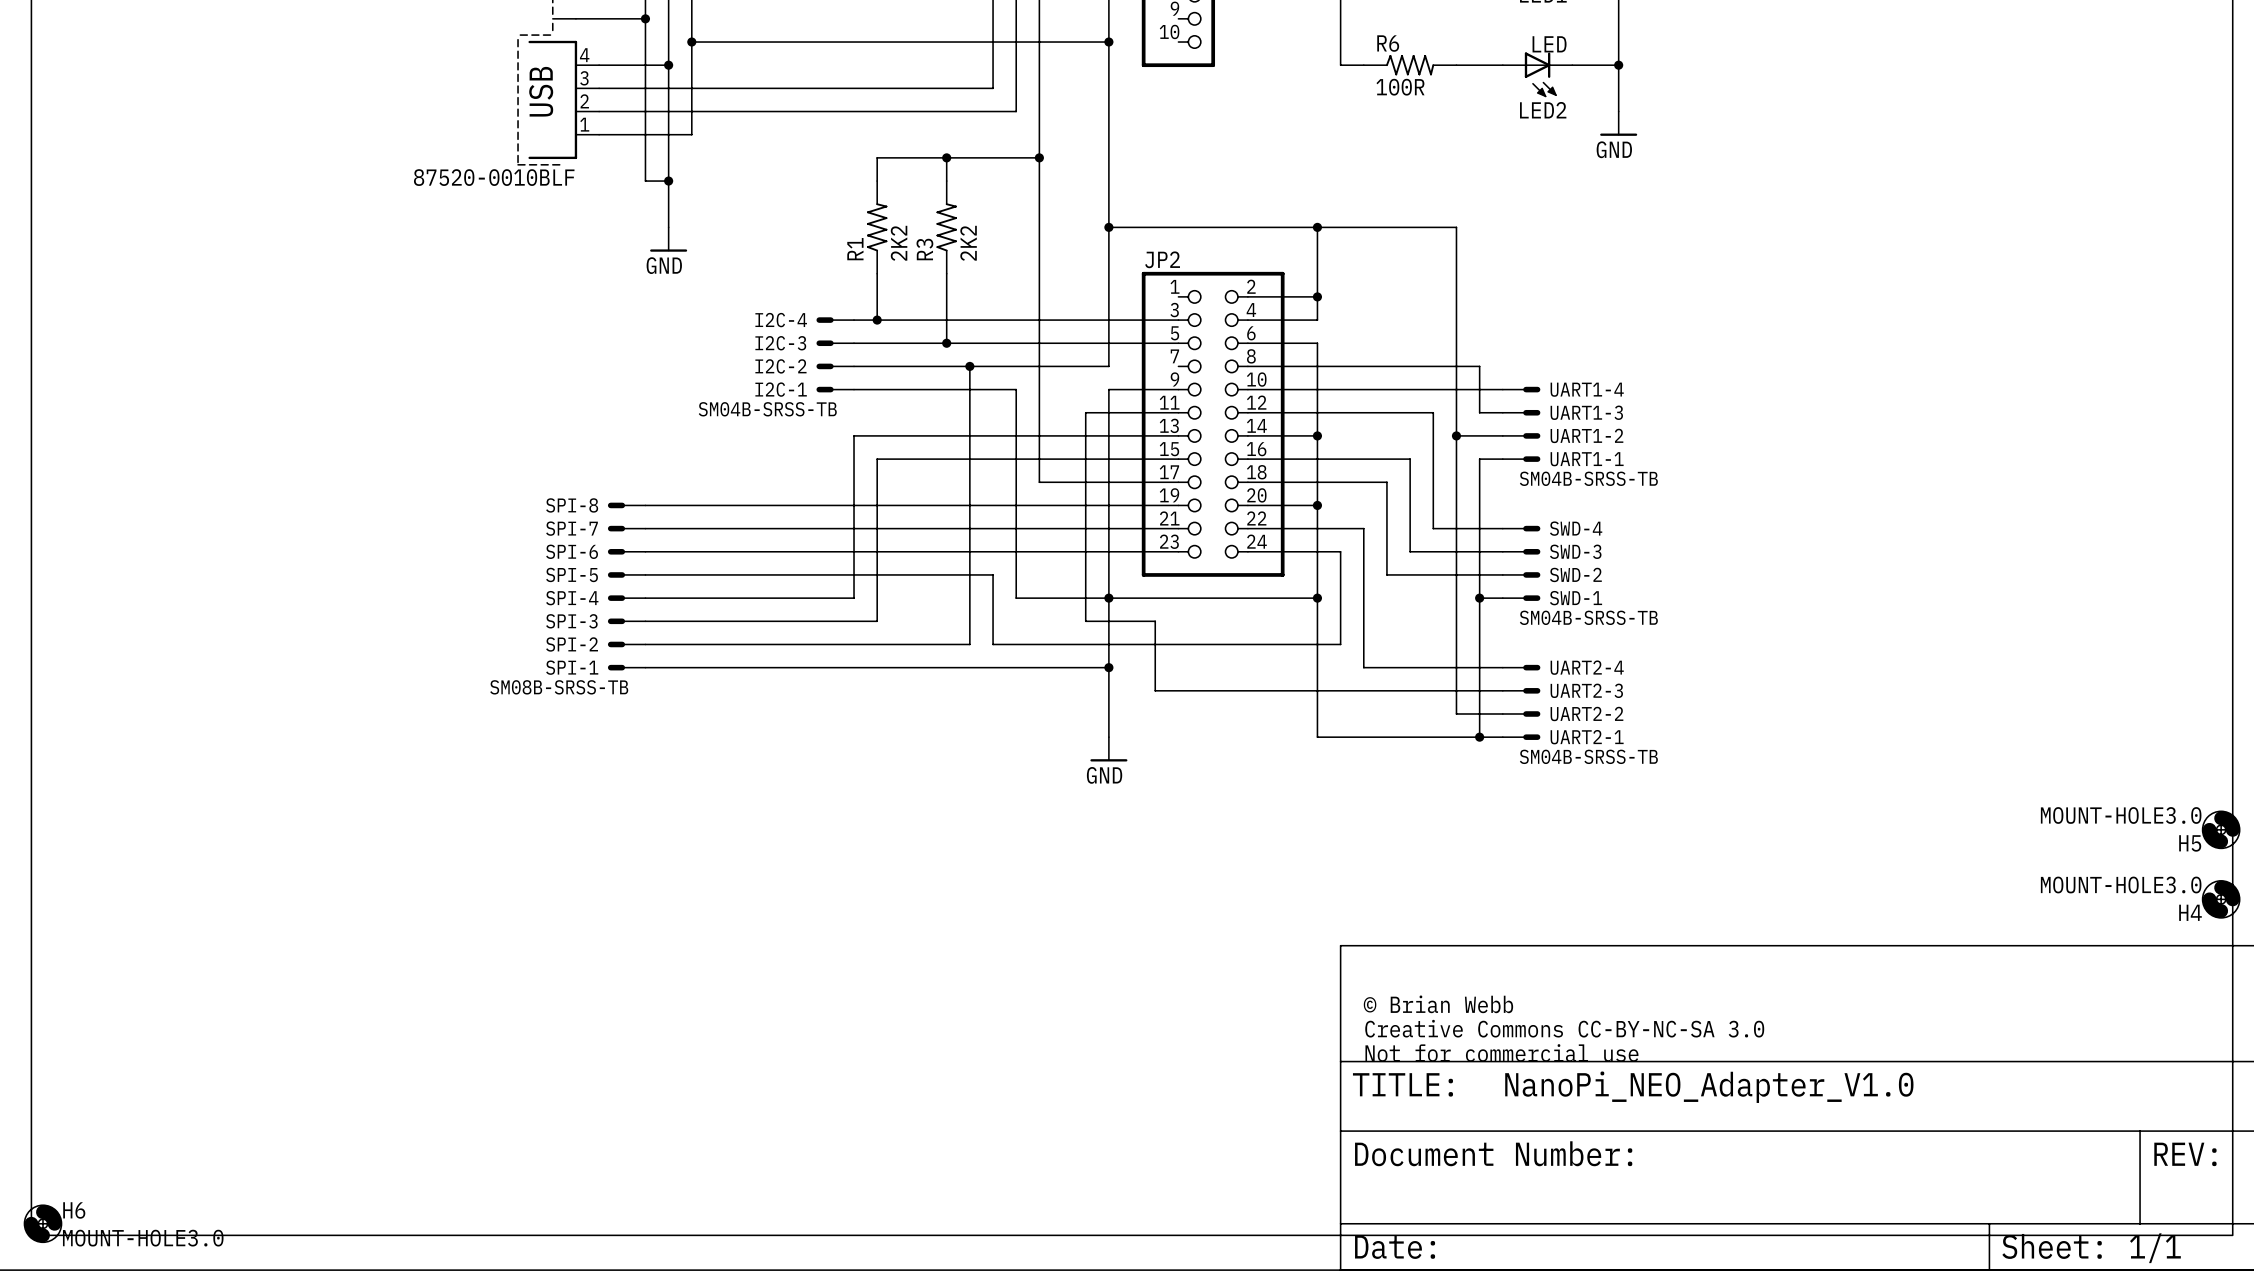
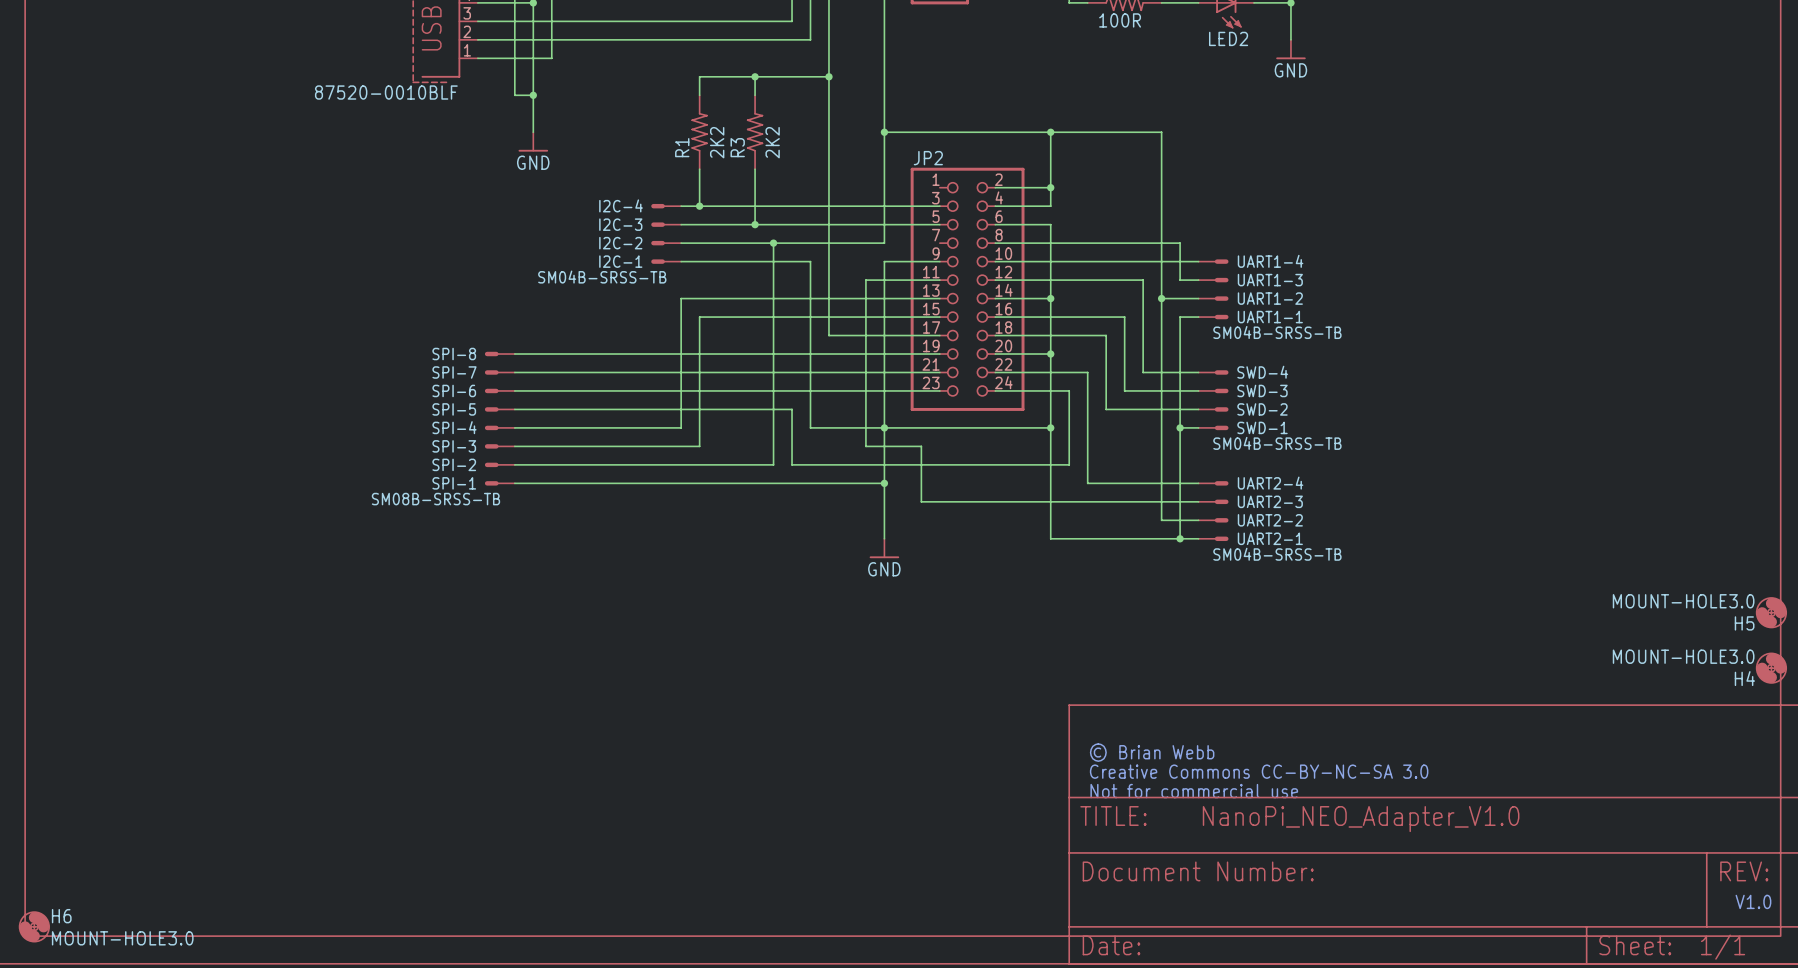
text: none -> V1.0 (1753, 901)

